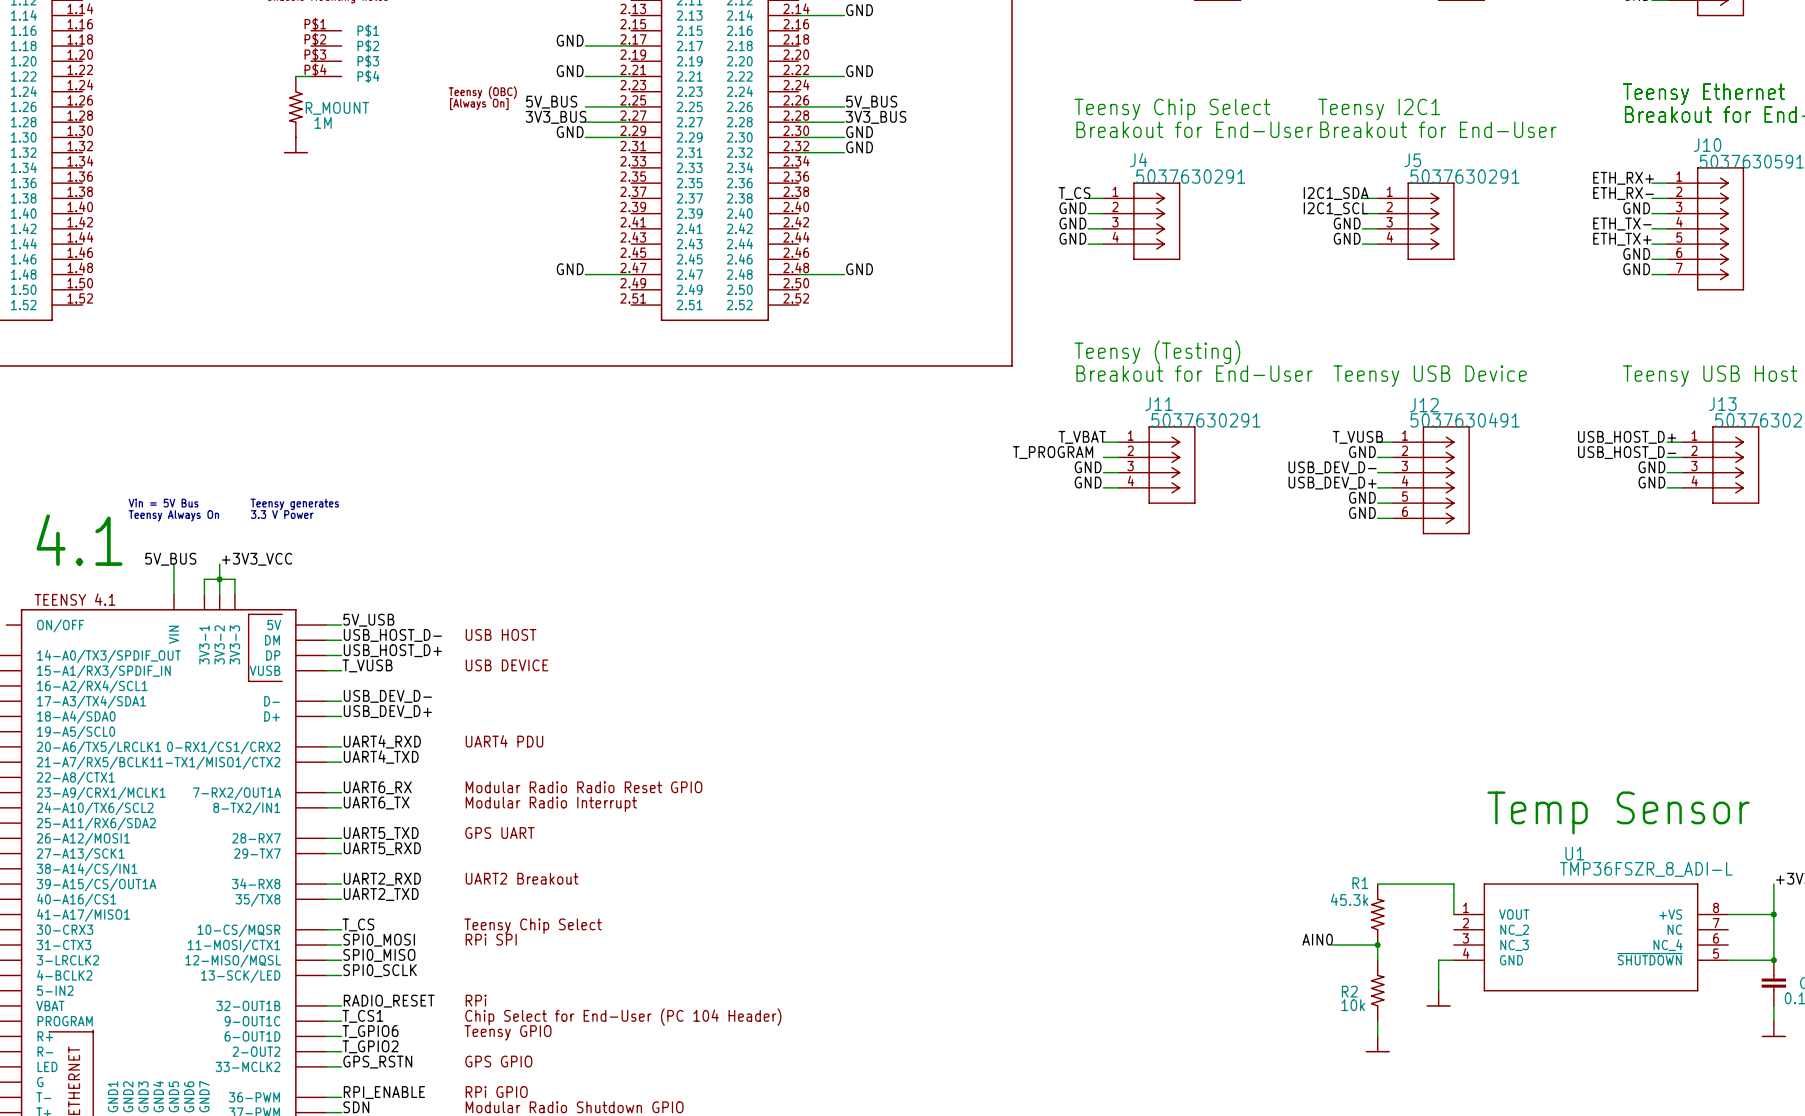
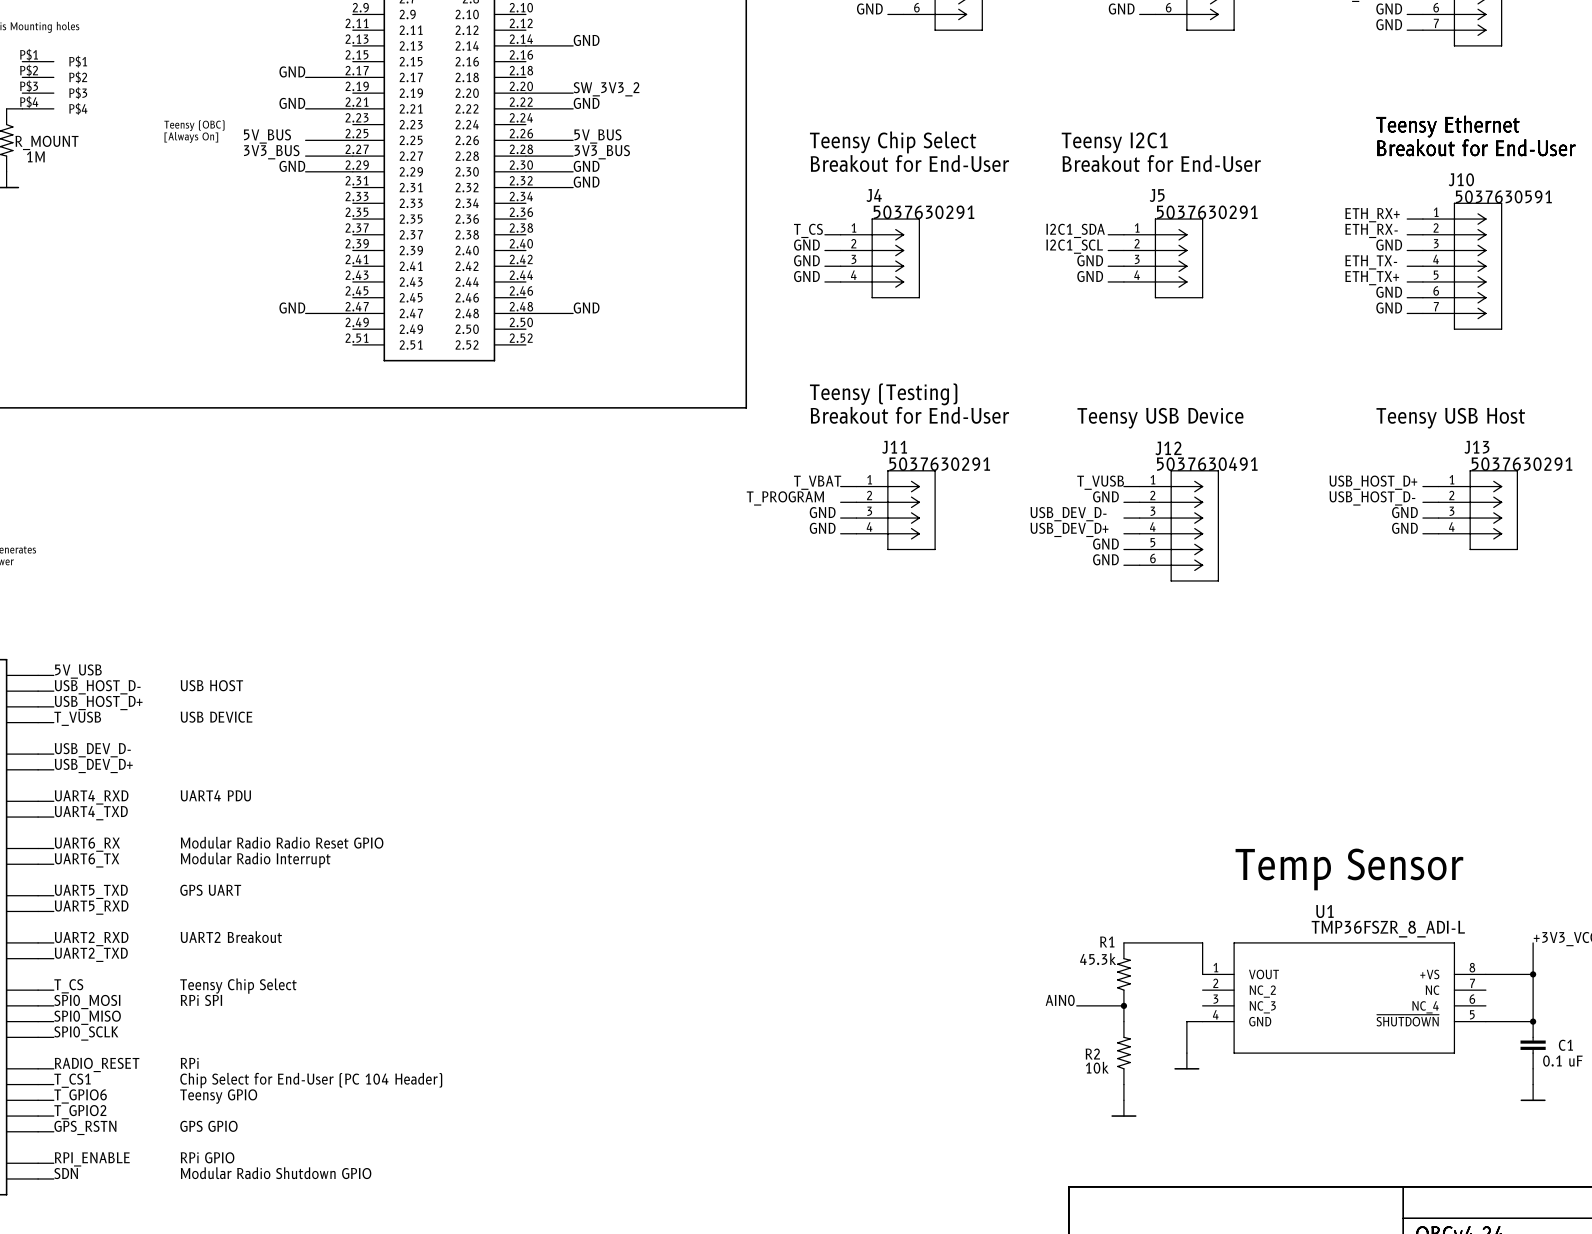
label: none -> SW_3V3_2 (606, 89)
wire: none -> (525, 93) (573, 93)

